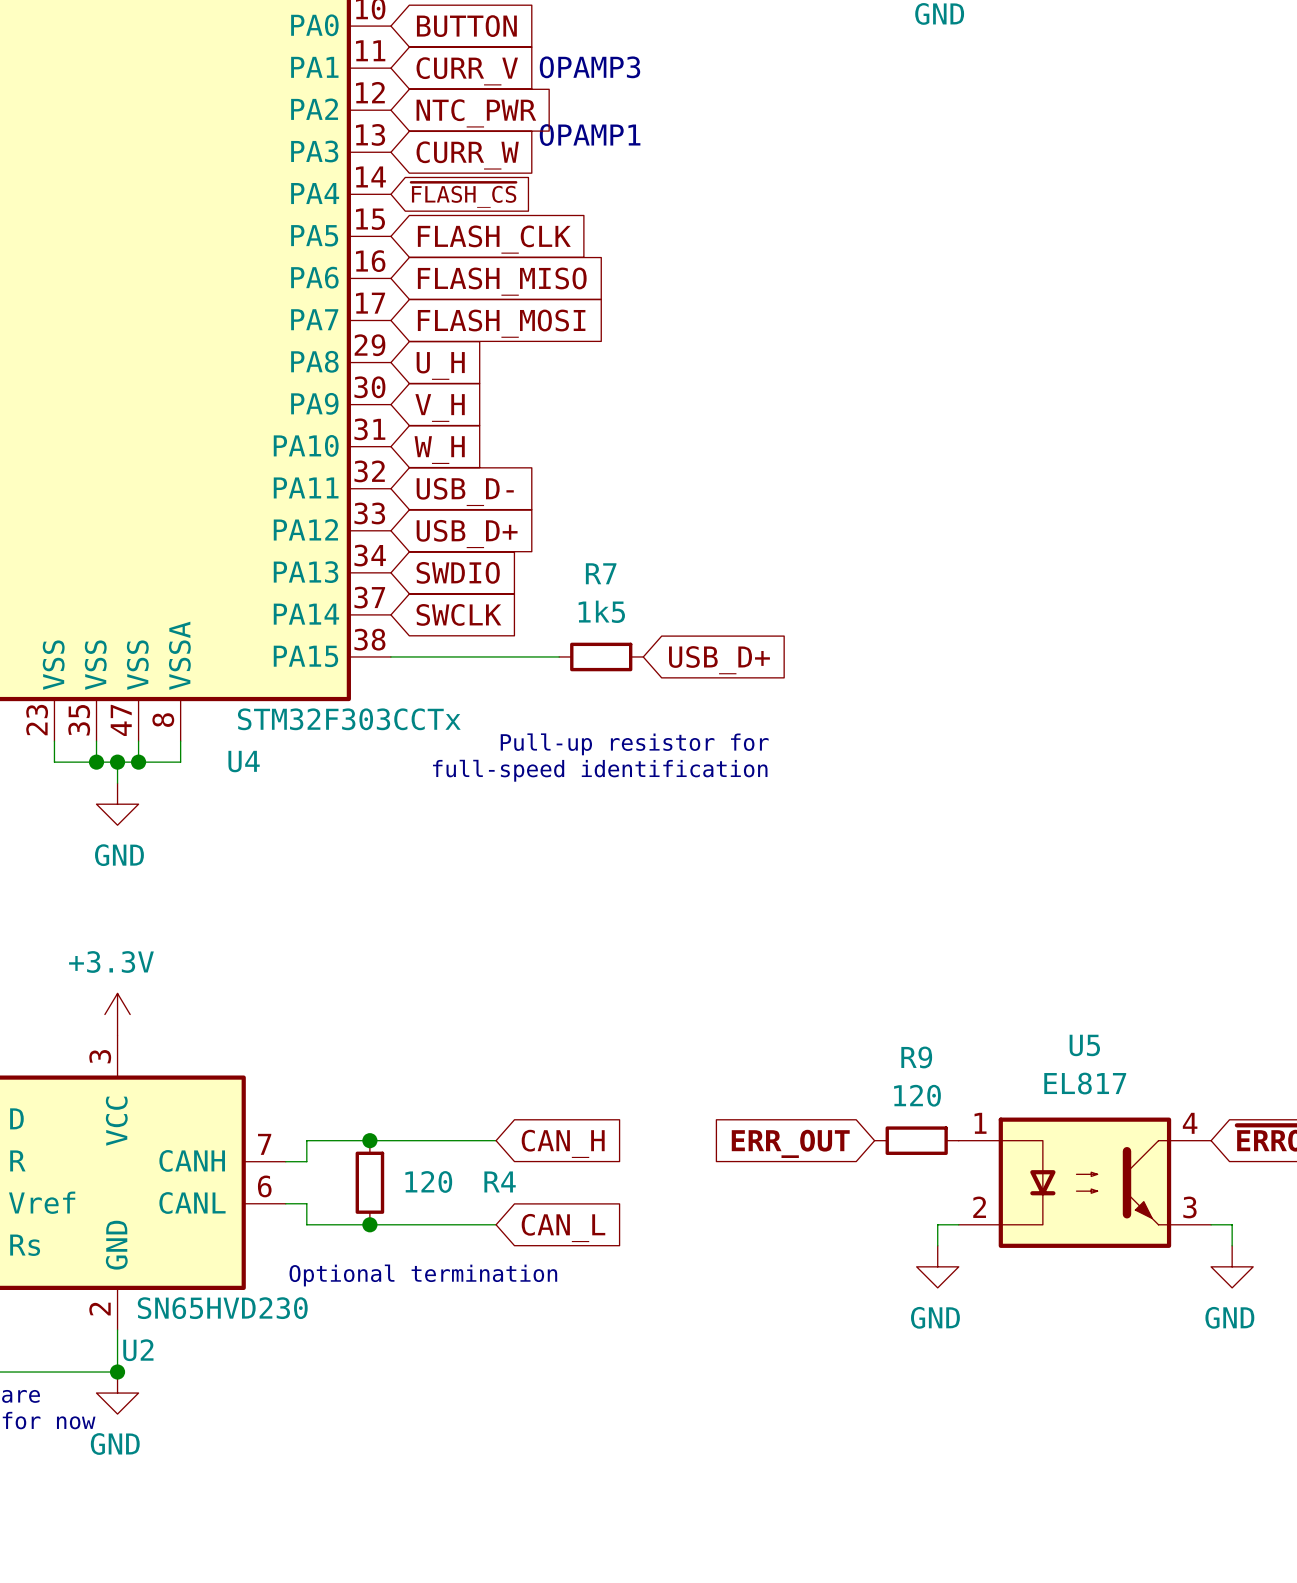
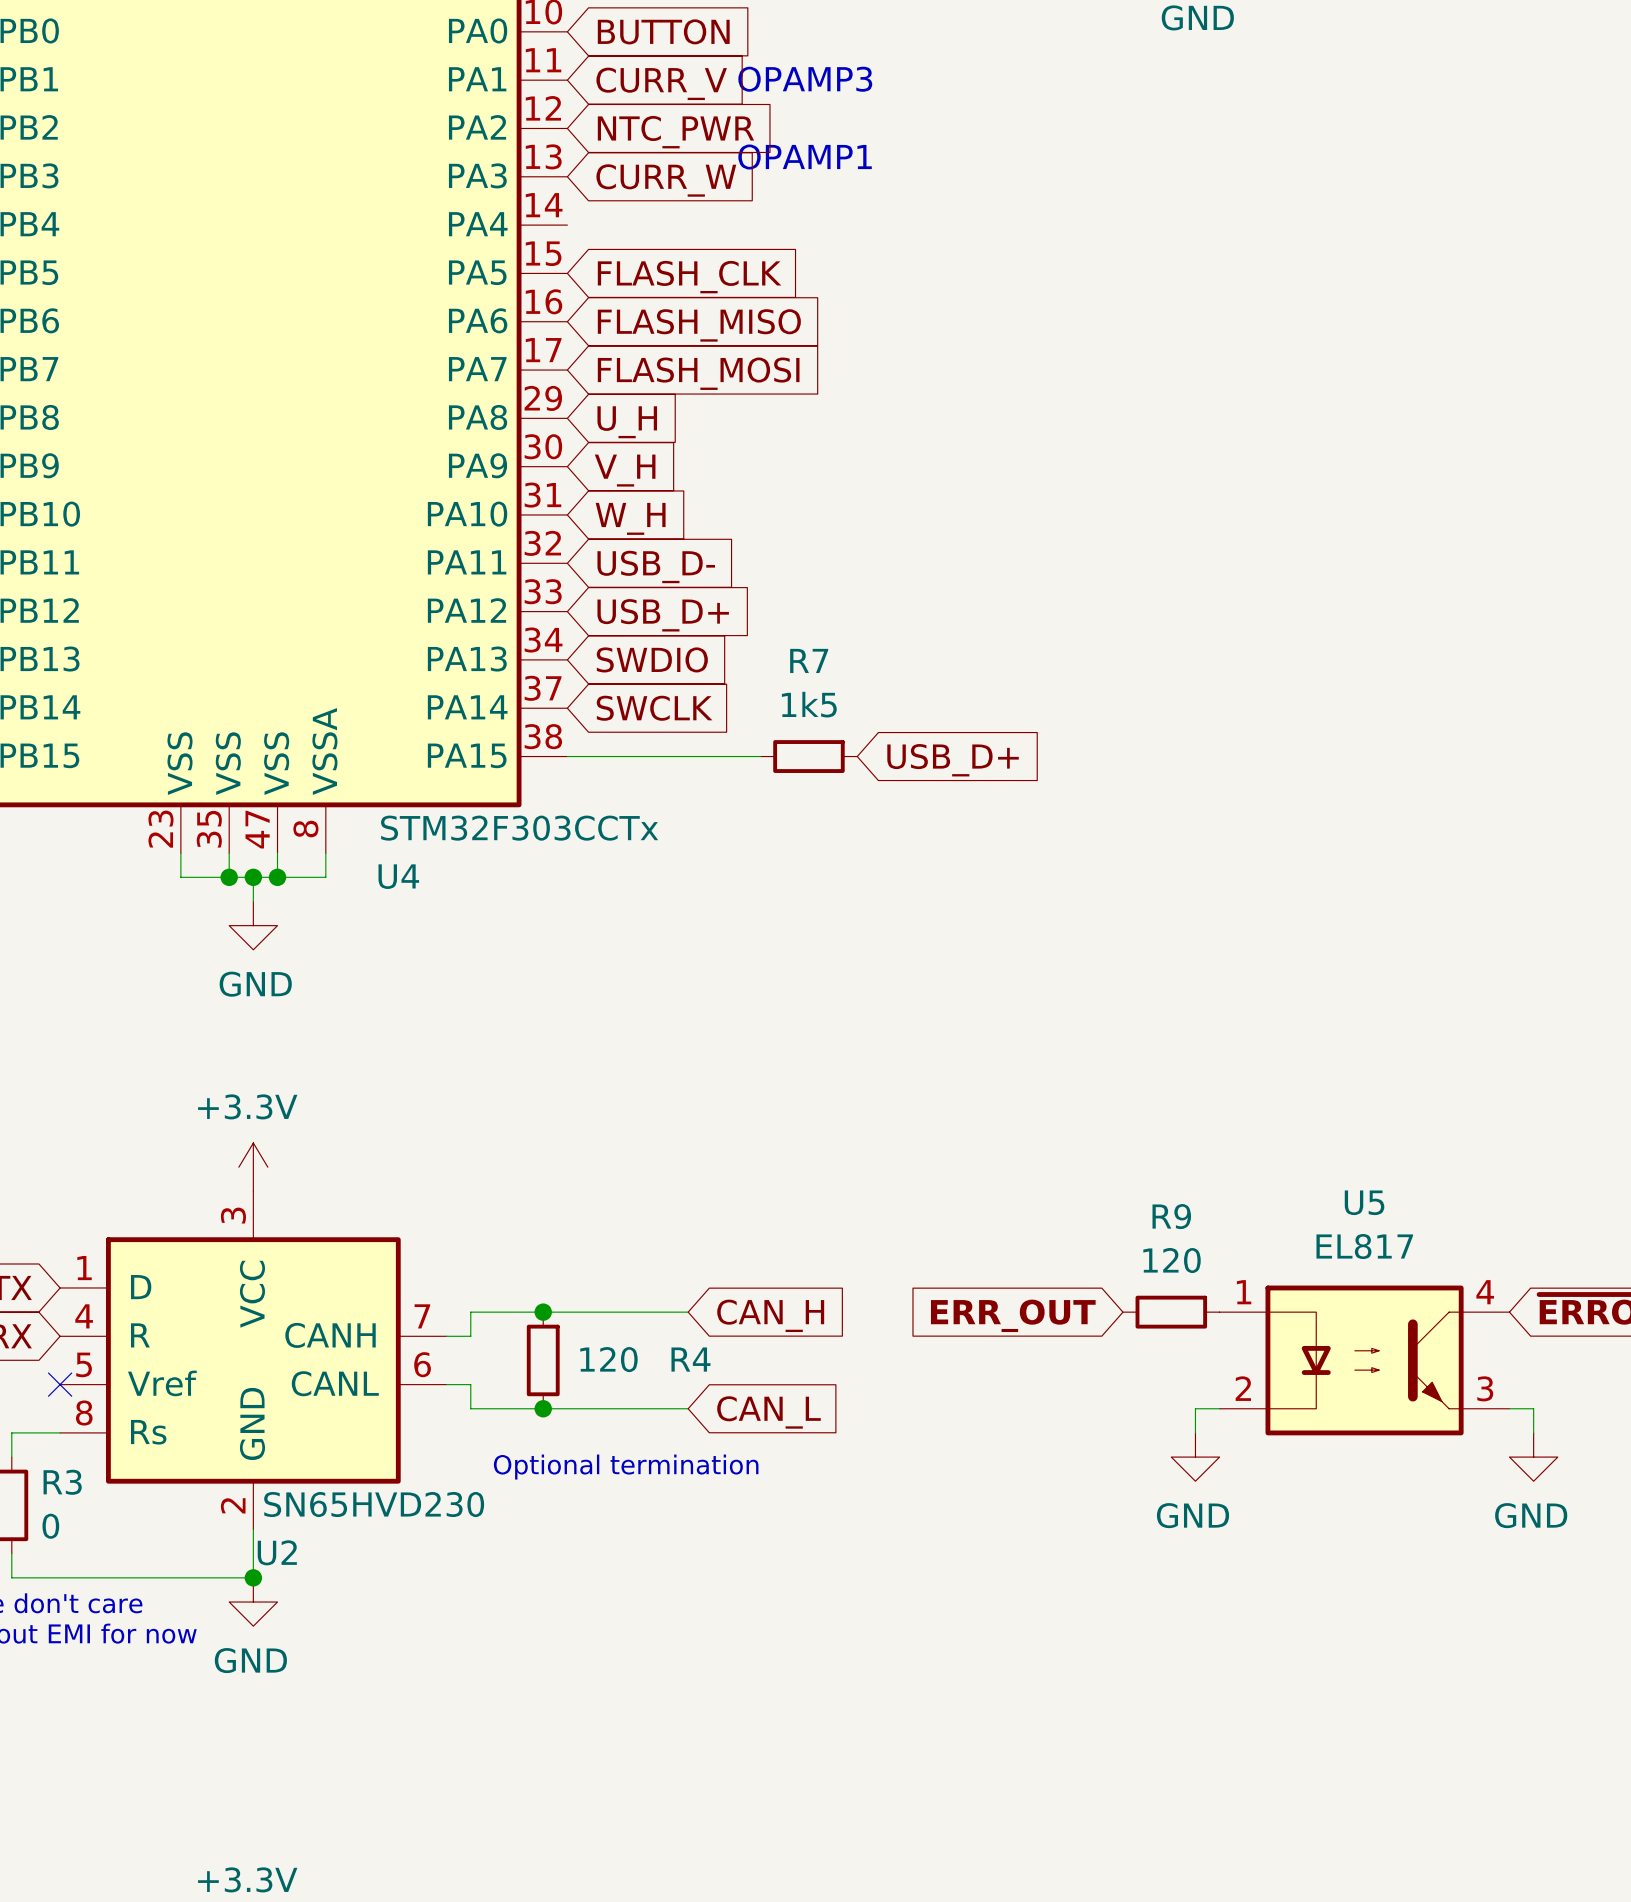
global label: ~{FLASH_CS} (463, 195) -> none
text: Pull-up resistor for (634, 744) -> none
text: full-speed identification (600, 770) -> none

